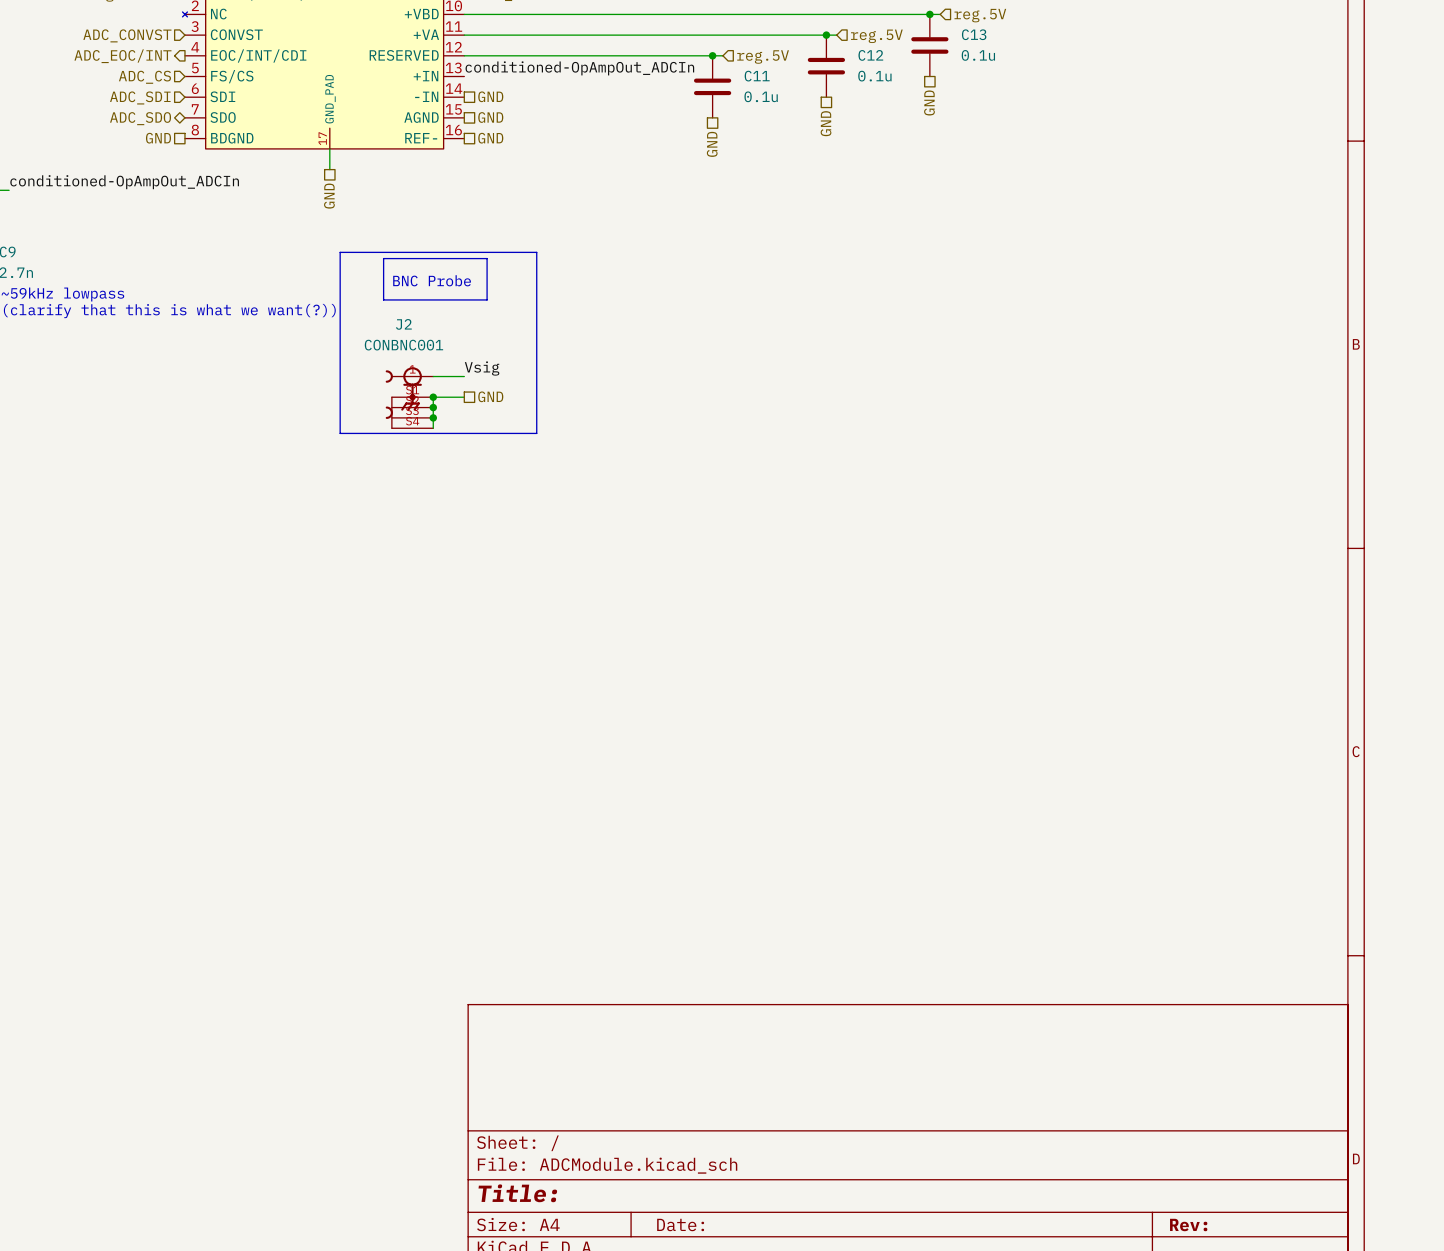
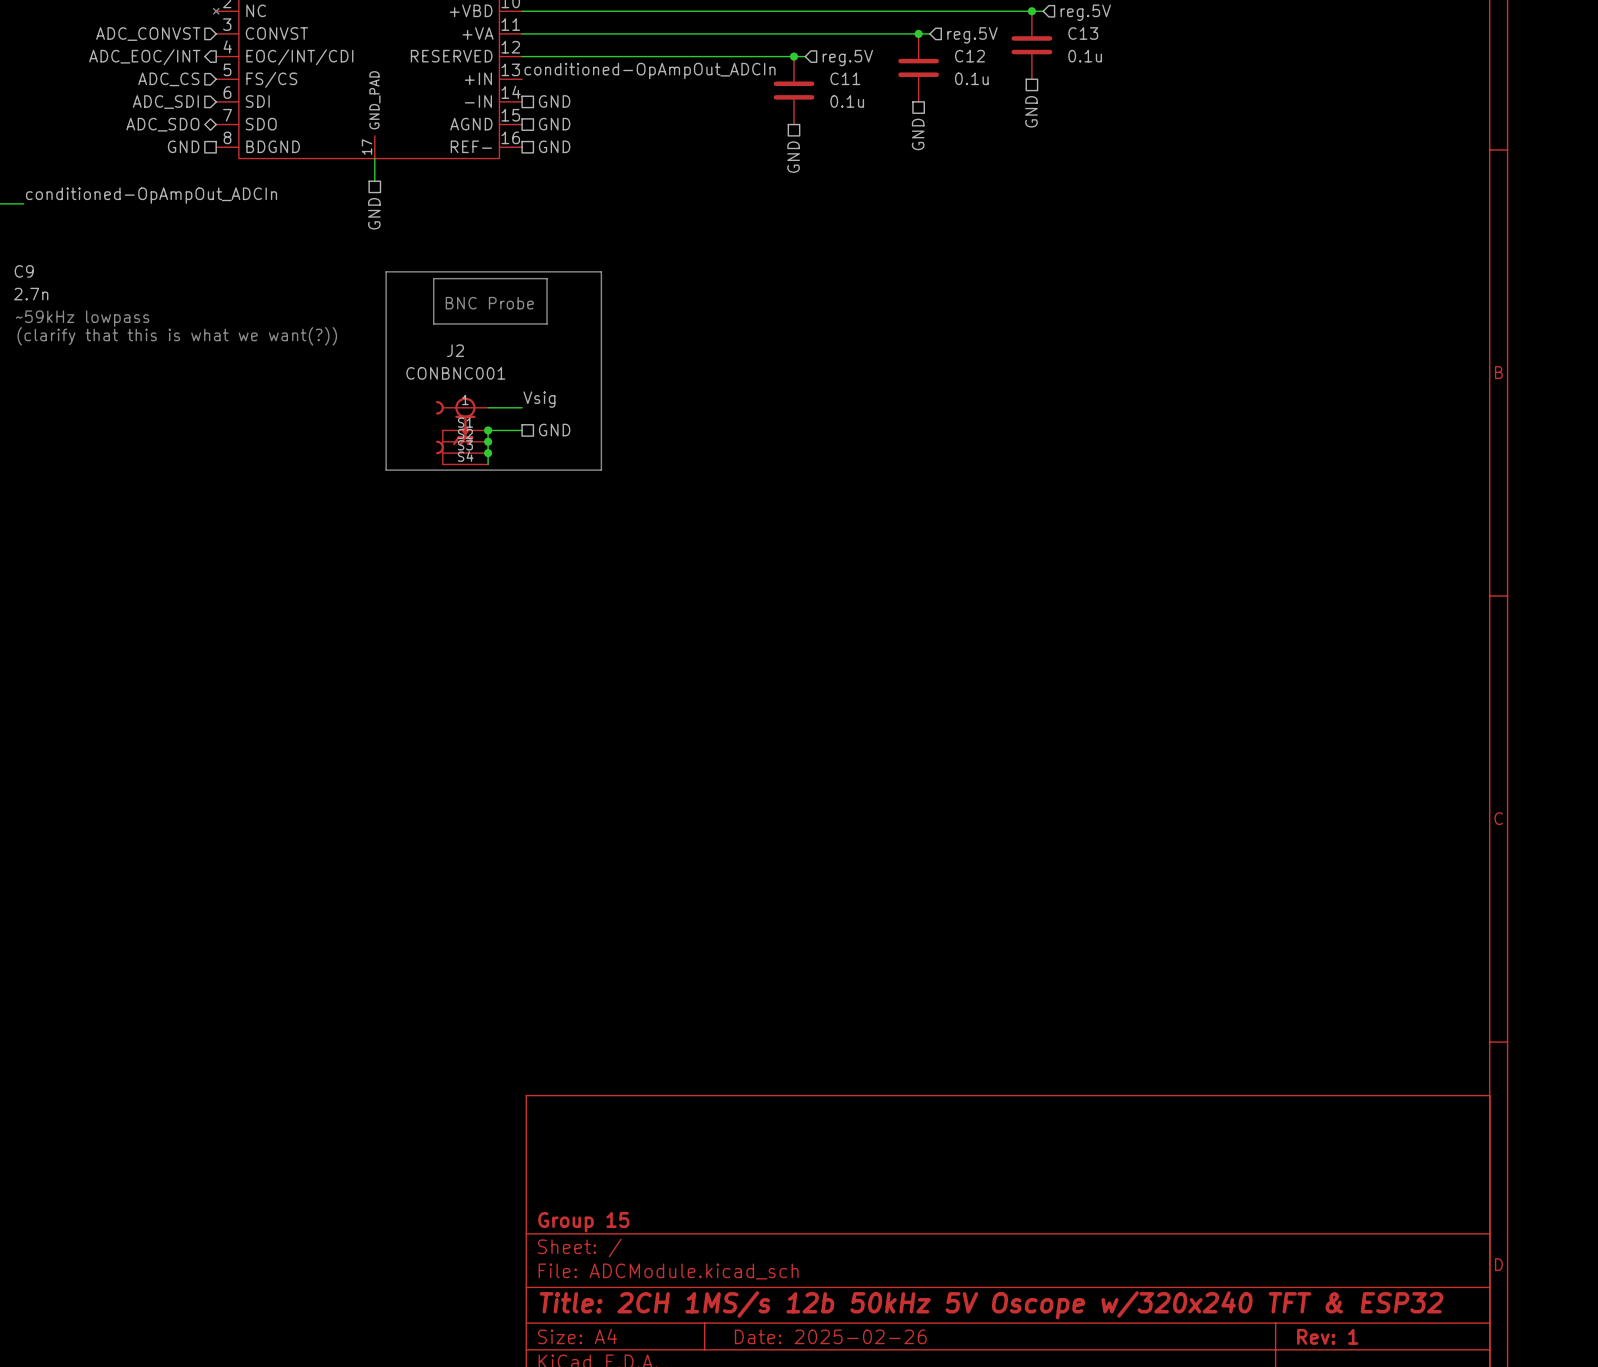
title block: none -> Group 15 (583, 1222)
title block: Title: (517, 1193) -> Title: 2CH 1MS/s 12b 50kHz 5V Oscope w/320x240 TFT & ESP32 (991, 1305)
title block: Date: (680, 1225) -> Date: 2025-02-26 (830, 1336)
title block: Rev: (1188, 1225) -> Rev: 1 (1327, 1336)

